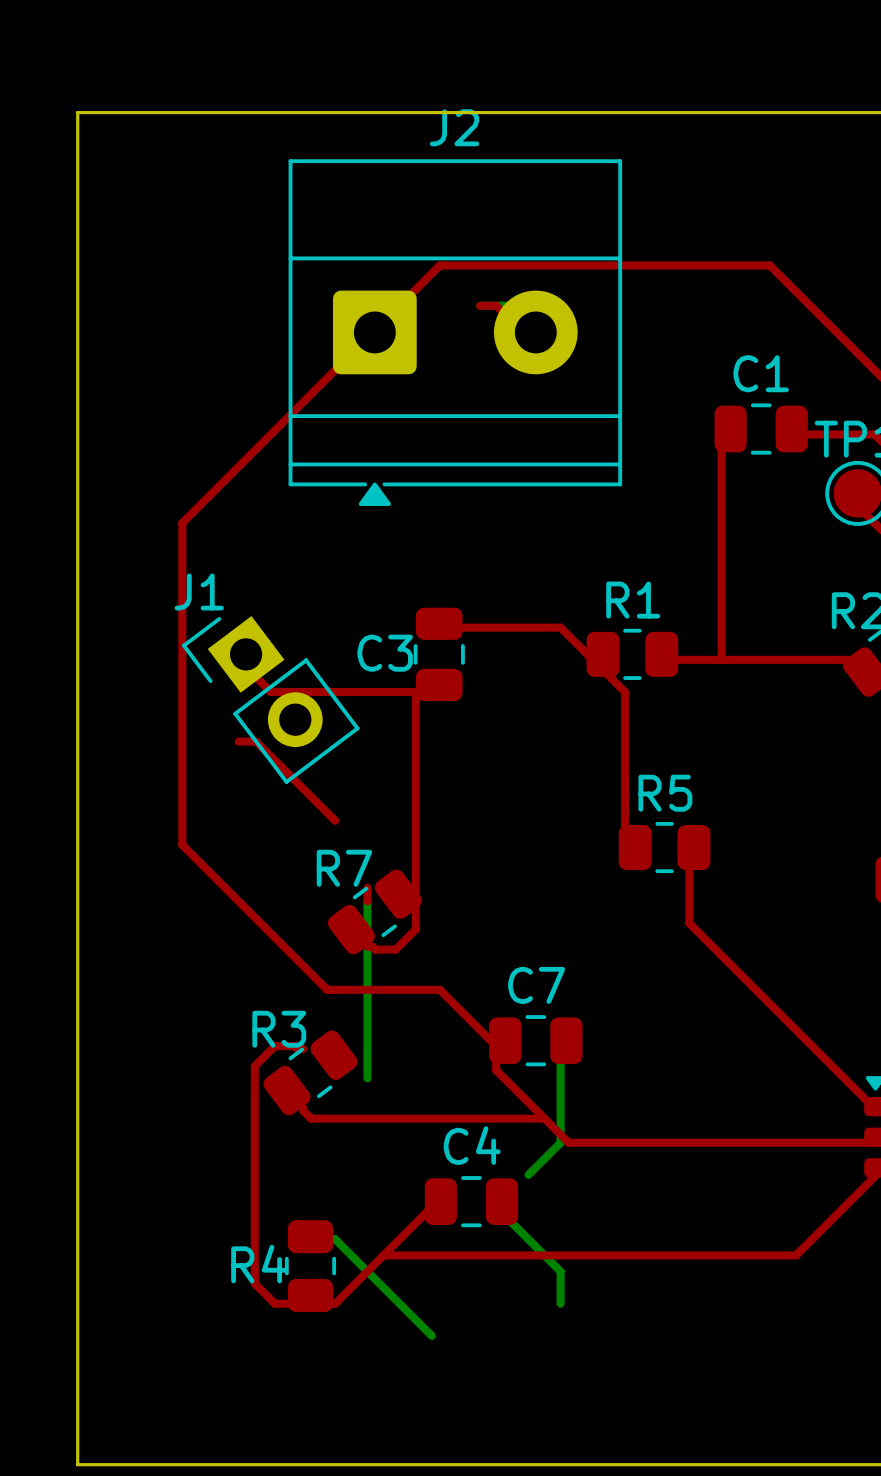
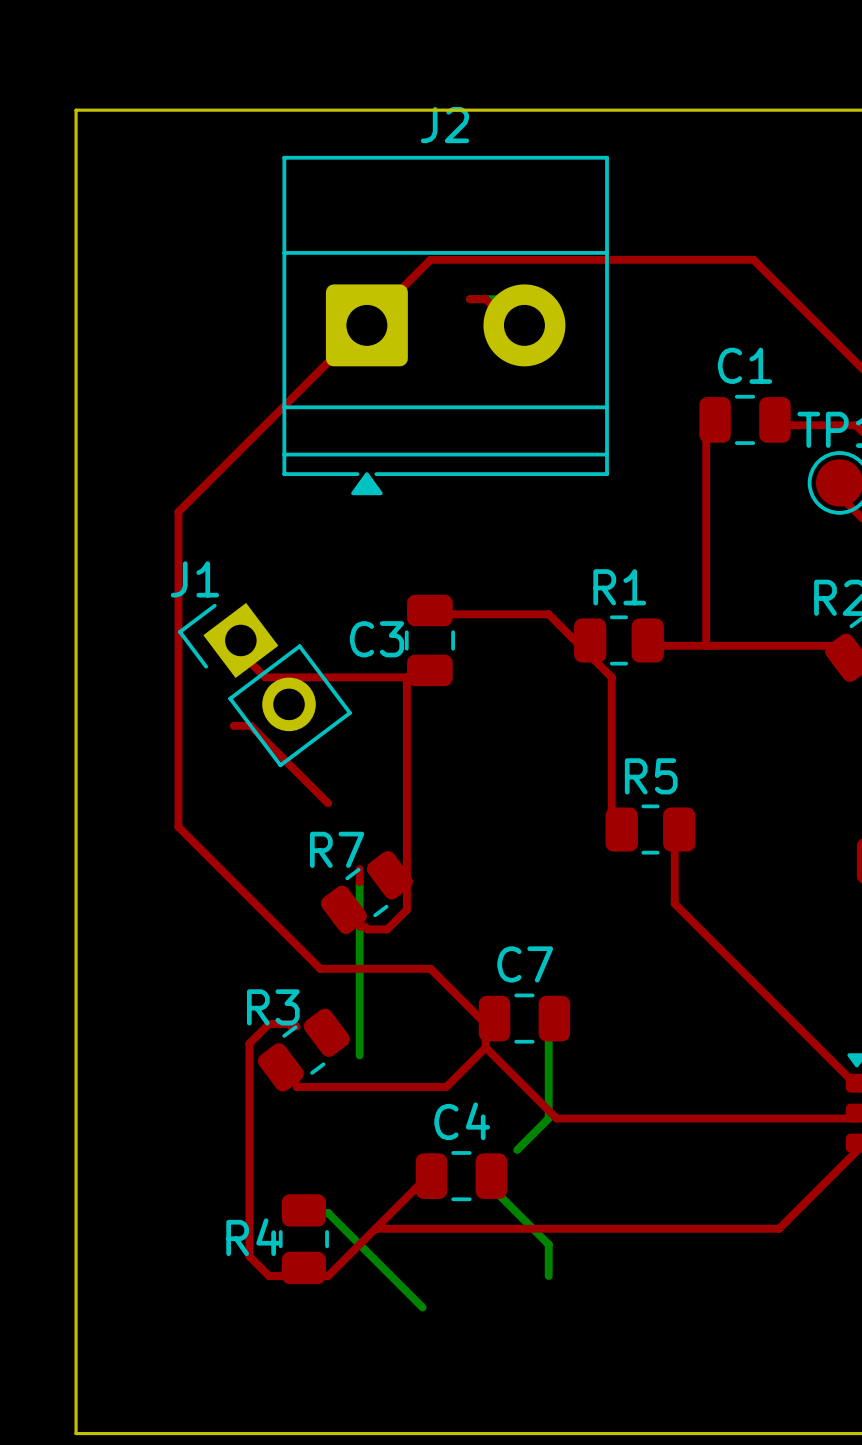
top track: (303, 1110) (311, 1118) (544, 1118) -> (296, 1086) (446, 1086) (485, 1047)

